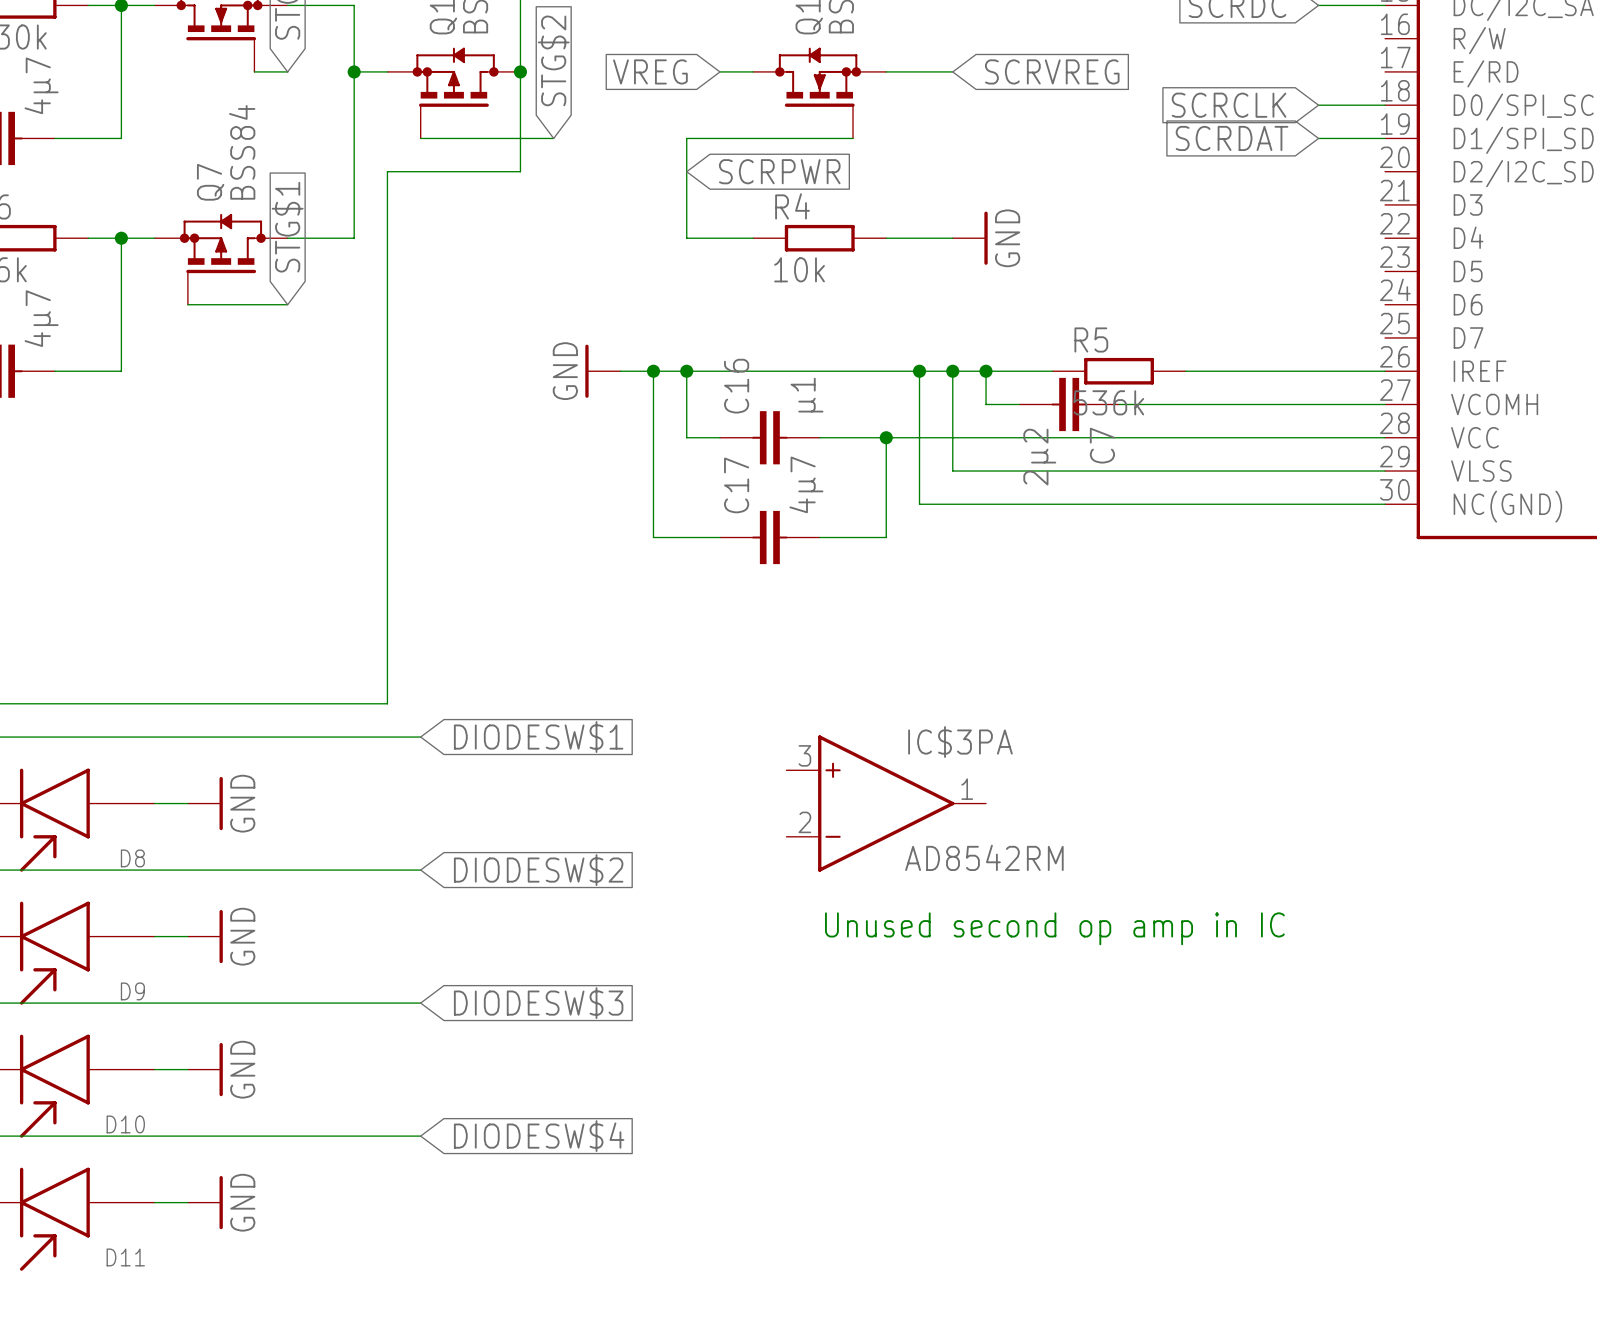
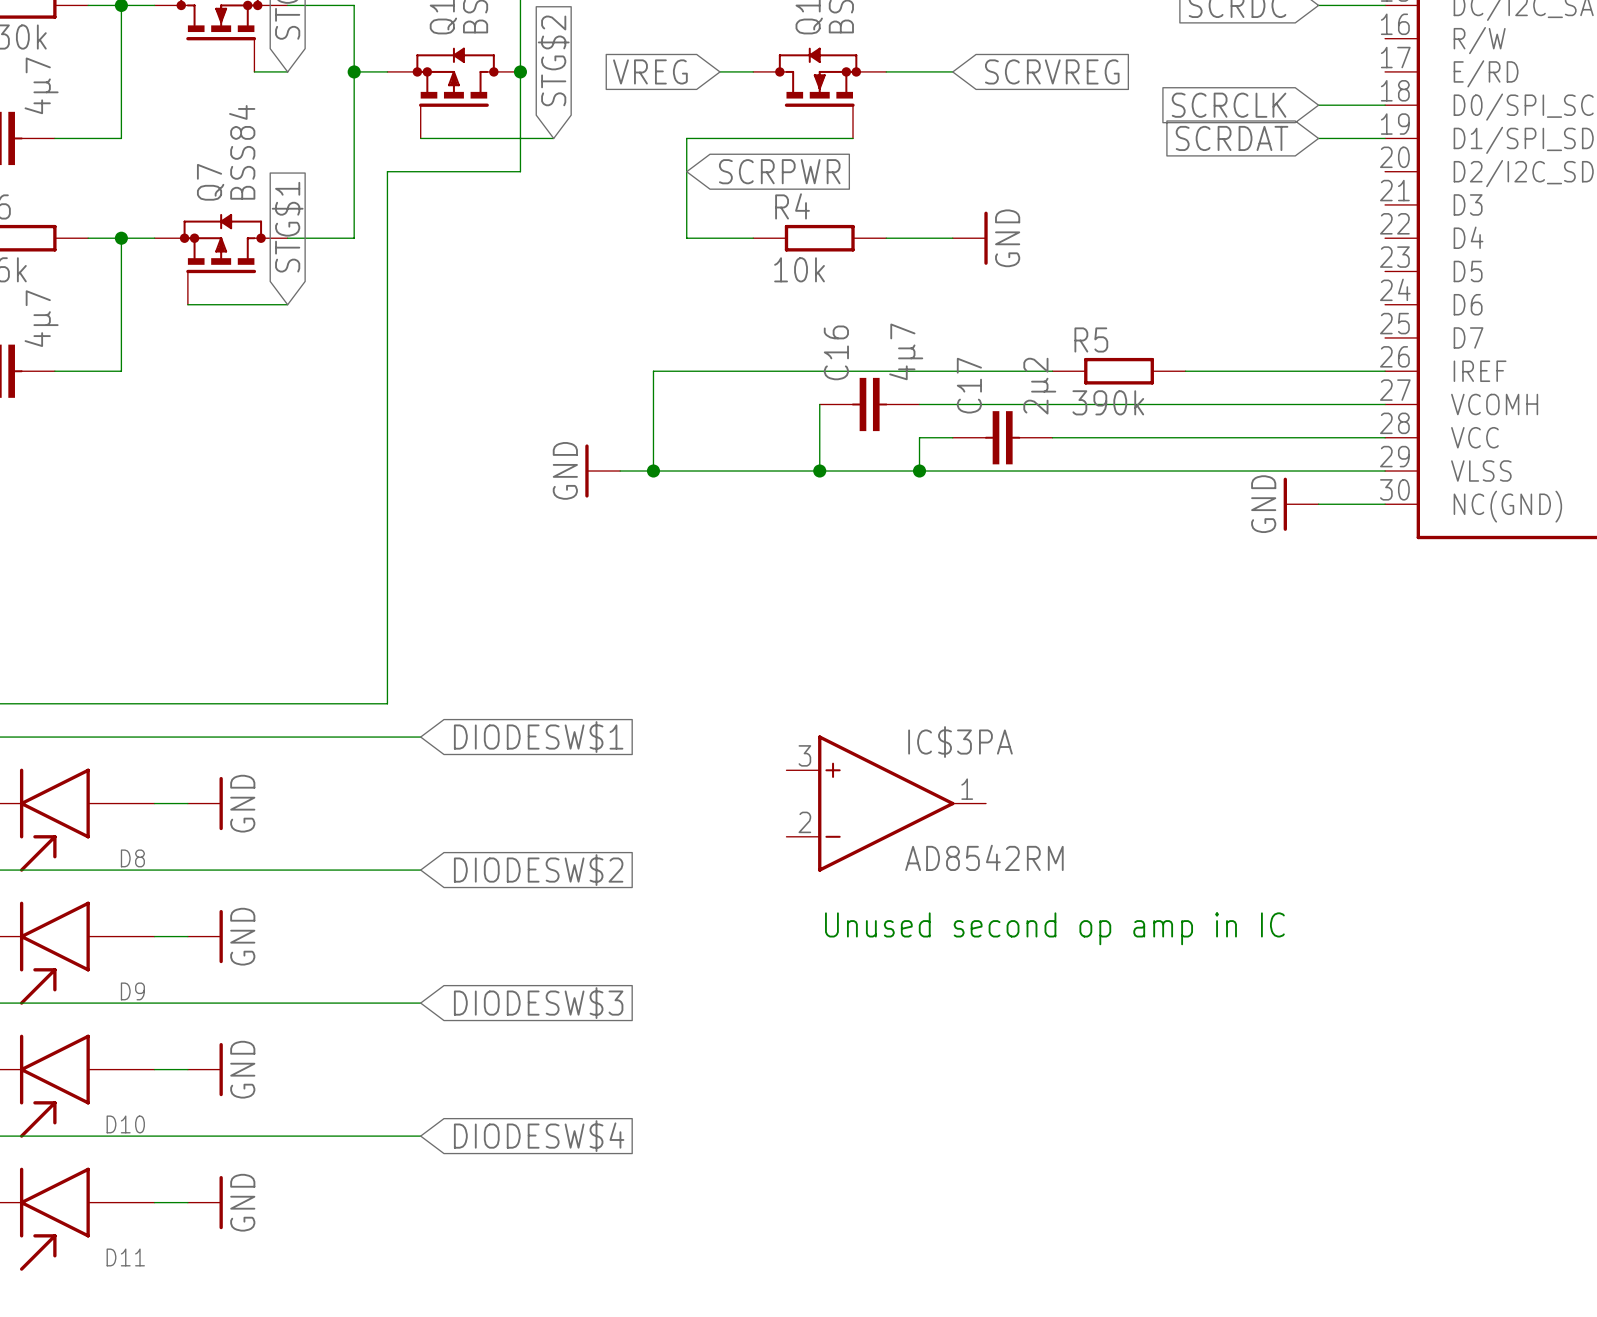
power symbol position: GND (602, 371) -> GND (602, 471)
wire: (620, 371) (653, 371) -> none
junction: (653, 371) -> none
wire: (686, 371) (686, 437) (719, 437) -> none
junction: (686, 371) -> none
wire: (919, 371) (919, 437) (819, 437) -> none
junction: (919, 371) -> none
wire: (952, 371) (952, 471) -> (620, 471) (952, 471)
junction: (952, 371) -> none
wire: (986, 371) (986, 404) -> (919, 404) (986, 404)
junction: (986, 371) -> none
C16 value: µ1 (807, 395) -> 4µ7 (906, 351)
R5 value: 536k (1108, 402) -> 390k (1108, 402)
wire: none -> (819, 404) (819, 471)
C7: 2µ2 (1069, 404) -> none
C16 position: (769, 437) -> (869, 404)
wire: (886, 437) (886, 537) (819, 537) -> none
junction: (886, 437) -> none
wire: (653, 471) (653, 537) (719, 537) -> none
junction: none -> (653, 471)
junction: none -> (819, 471)
wire: (919, 471) (919, 504) (1318, 504) -> none
junction: none -> (919, 471)
C17 value: 4µ7 (806, 484) -> 2µ2 (1039, 386)
power symbol: none -> GND (1301, 504)
C17 position: (769, 537) -> (1002, 437)

